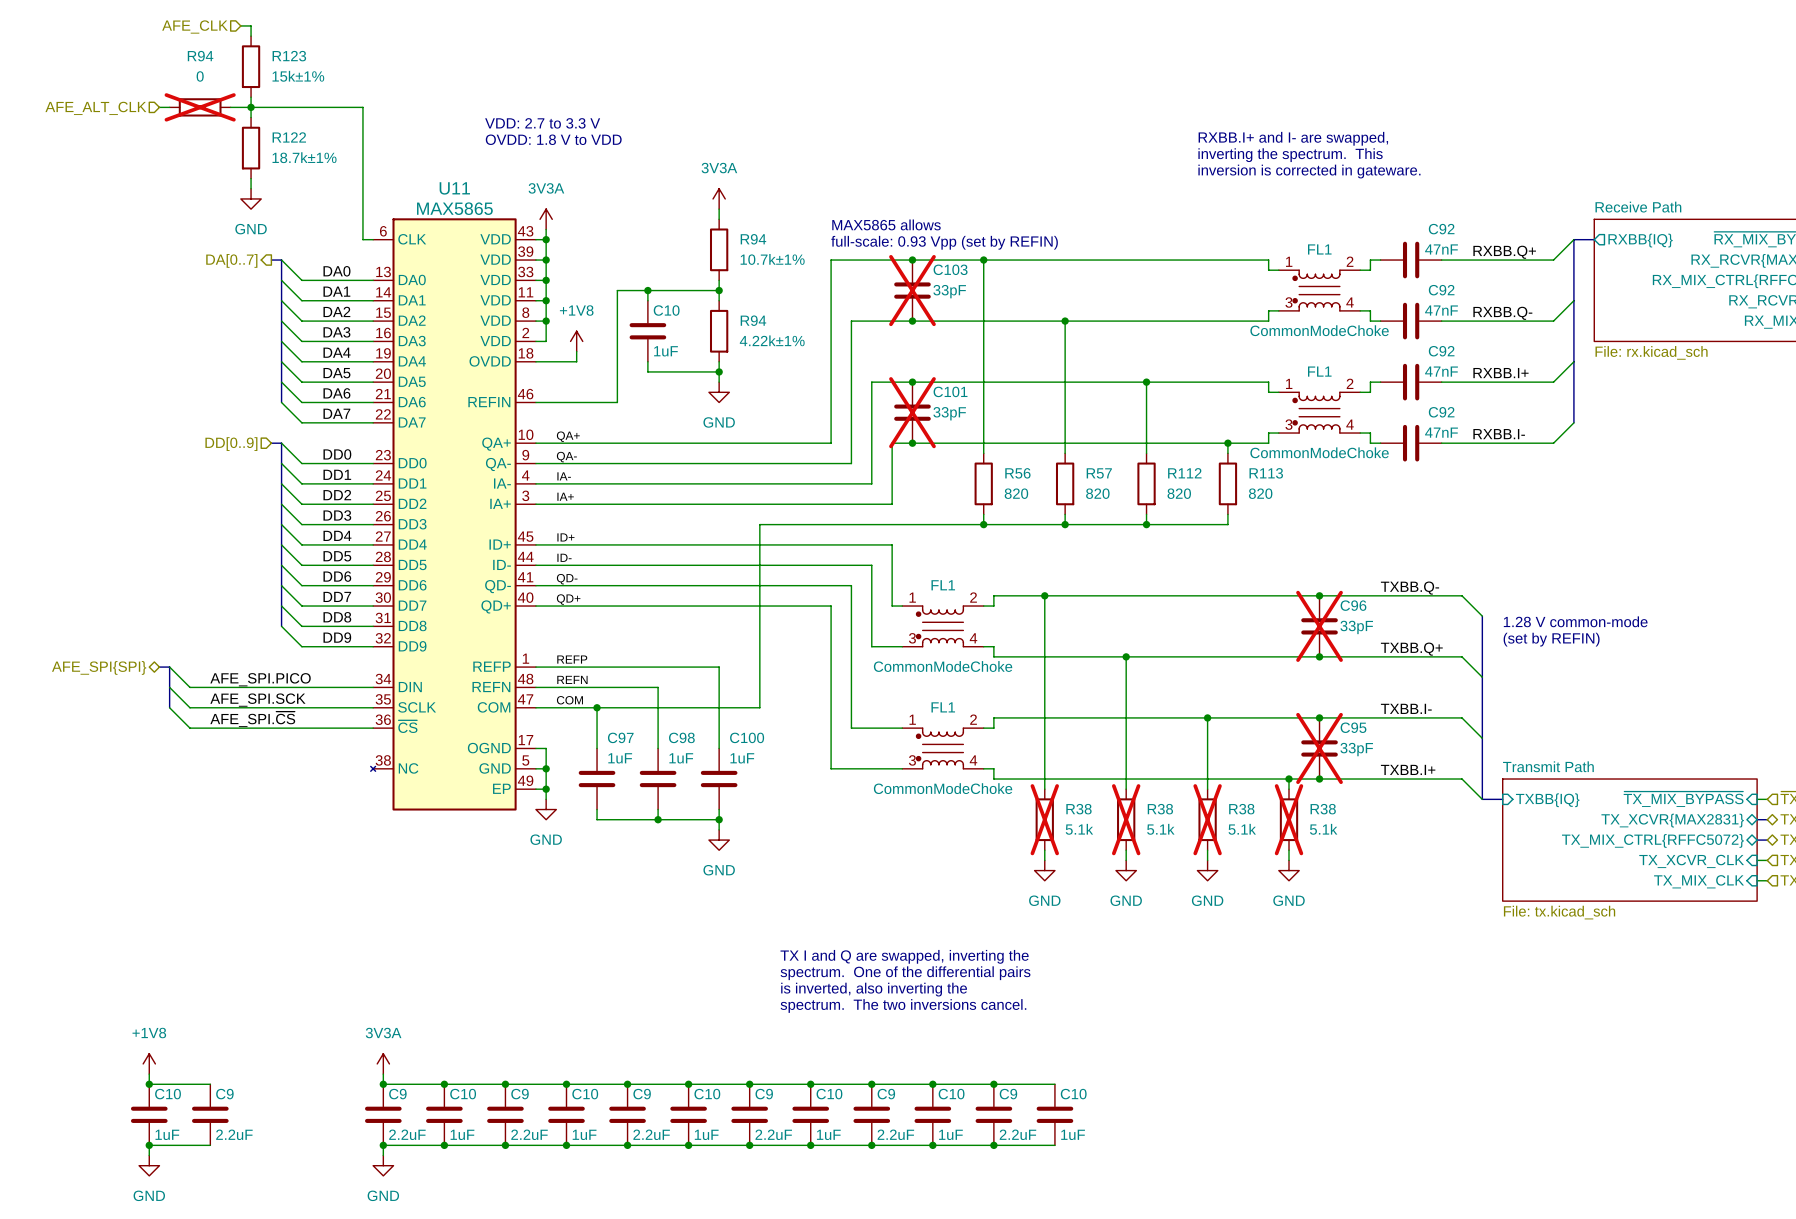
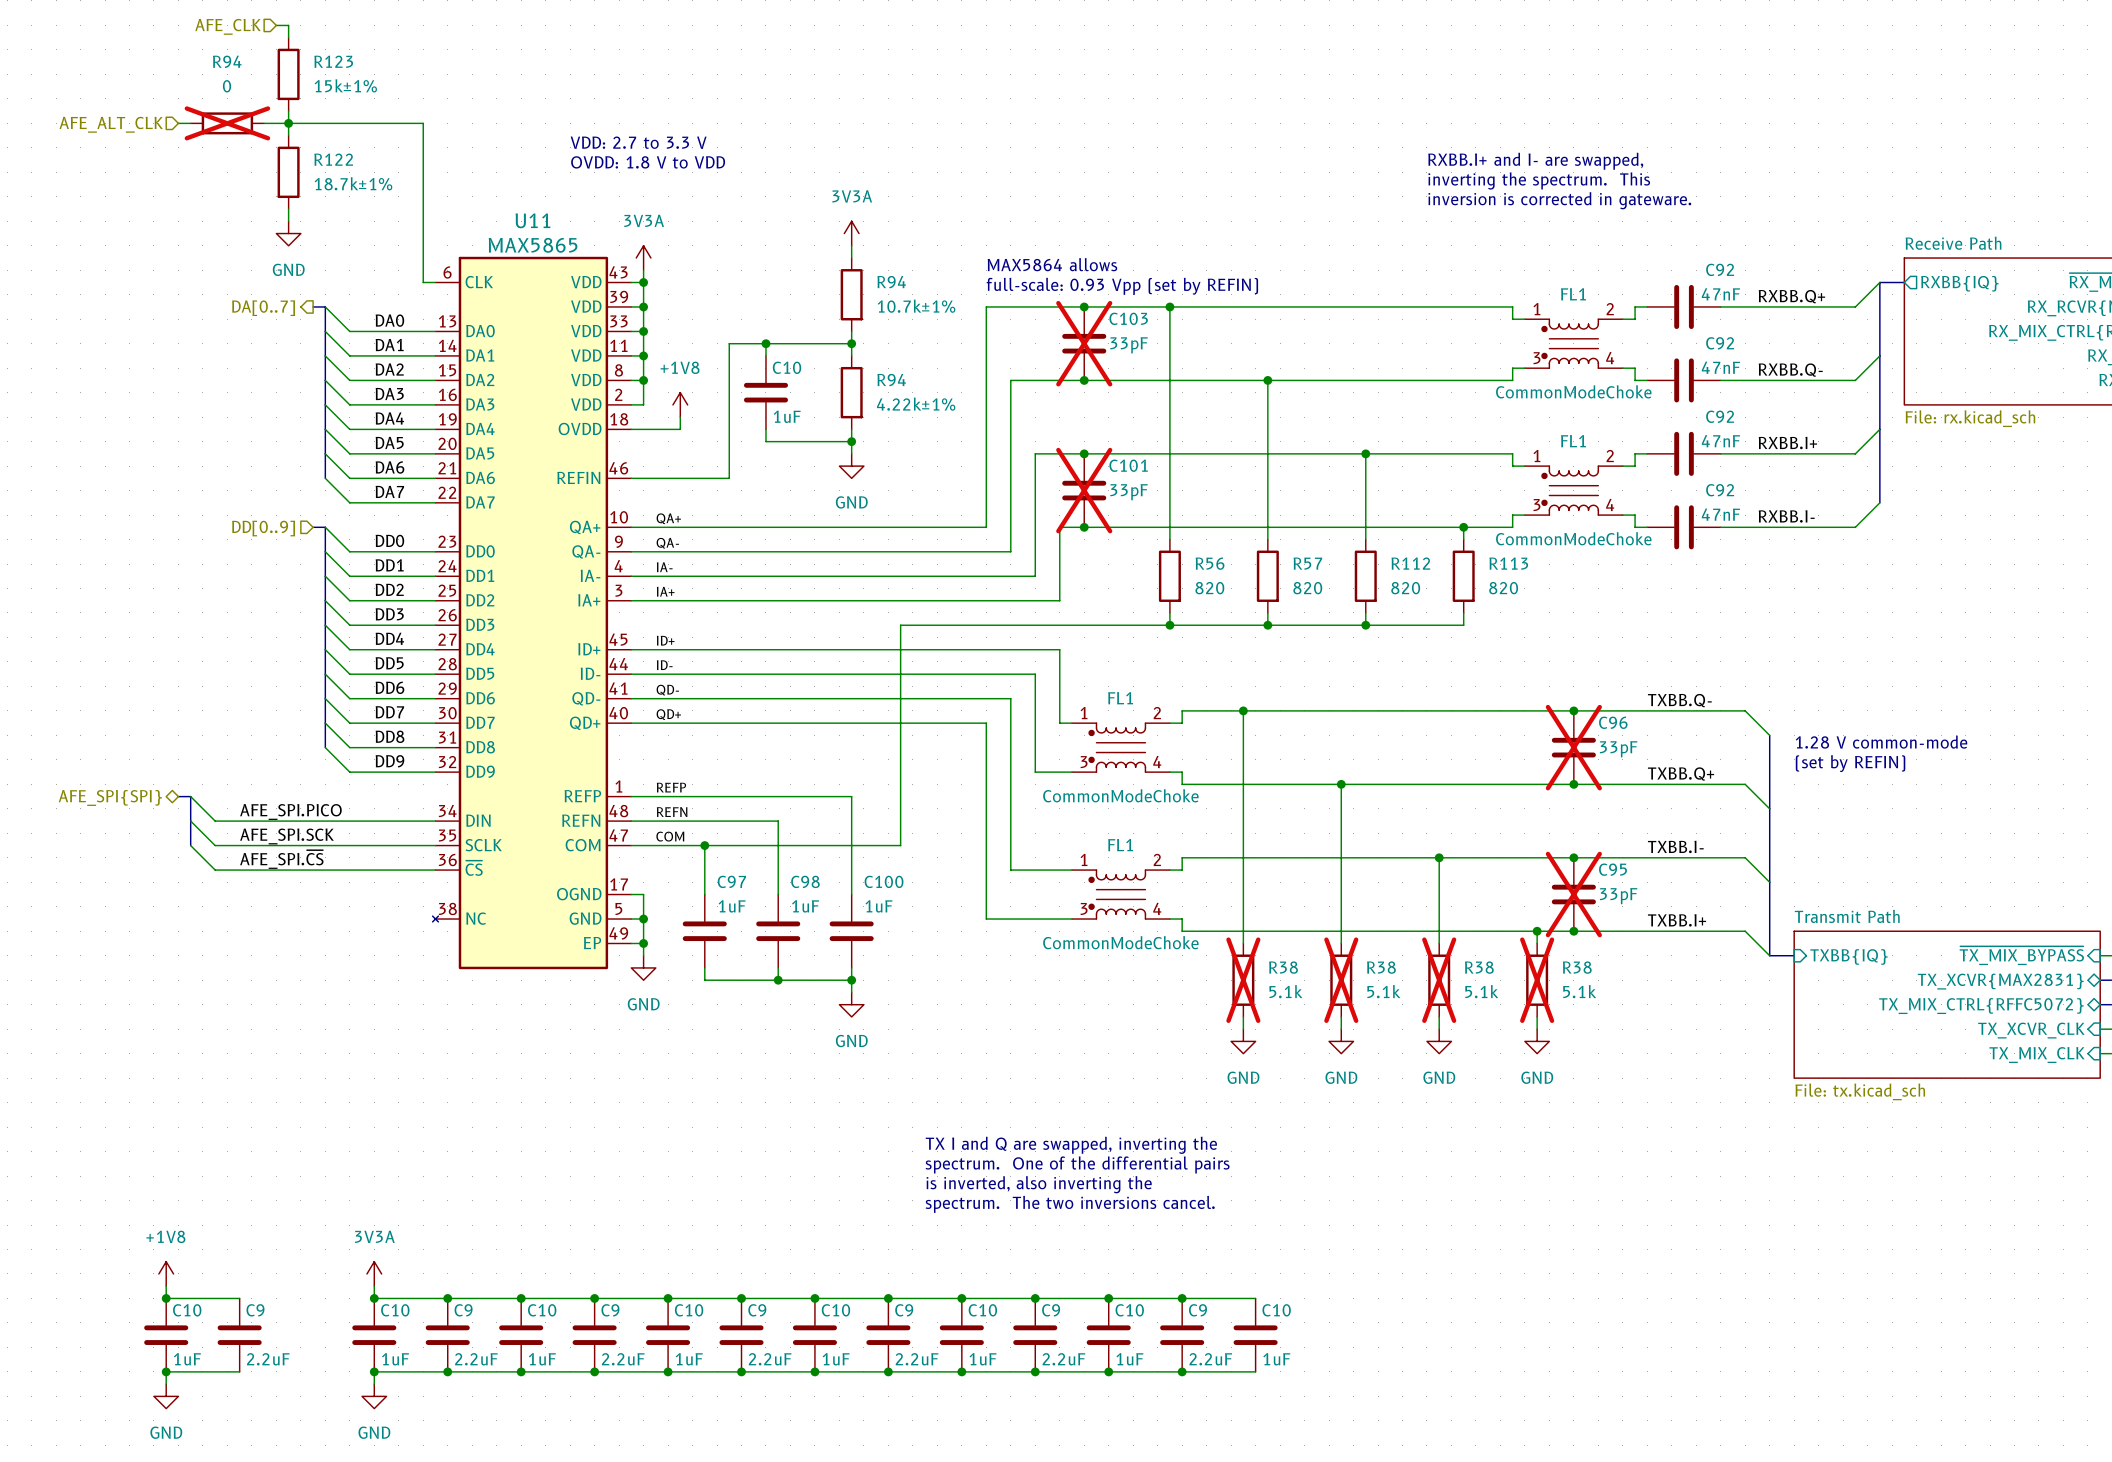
text: MAX5865 allows (886, 224) -> MAX5864 allows (1052, 264)
power symbol position: 3V3A (383, 1063) -> 3V3A (374, 1273)
wire: (383, 1074) (383, 1084) -> (374, 1286) (374, 1298) (447, 1298)
junction: none -> (374, 1298)
C10: none -> 1uF (374, 1335)
junction: none -> (374, 1371)
wire: (383, 1145) (383, 1155) -> (447, 1371) (374, 1371) (374, 1384)
power symbol position: GND (383, 1165) -> GND (374, 1396)

